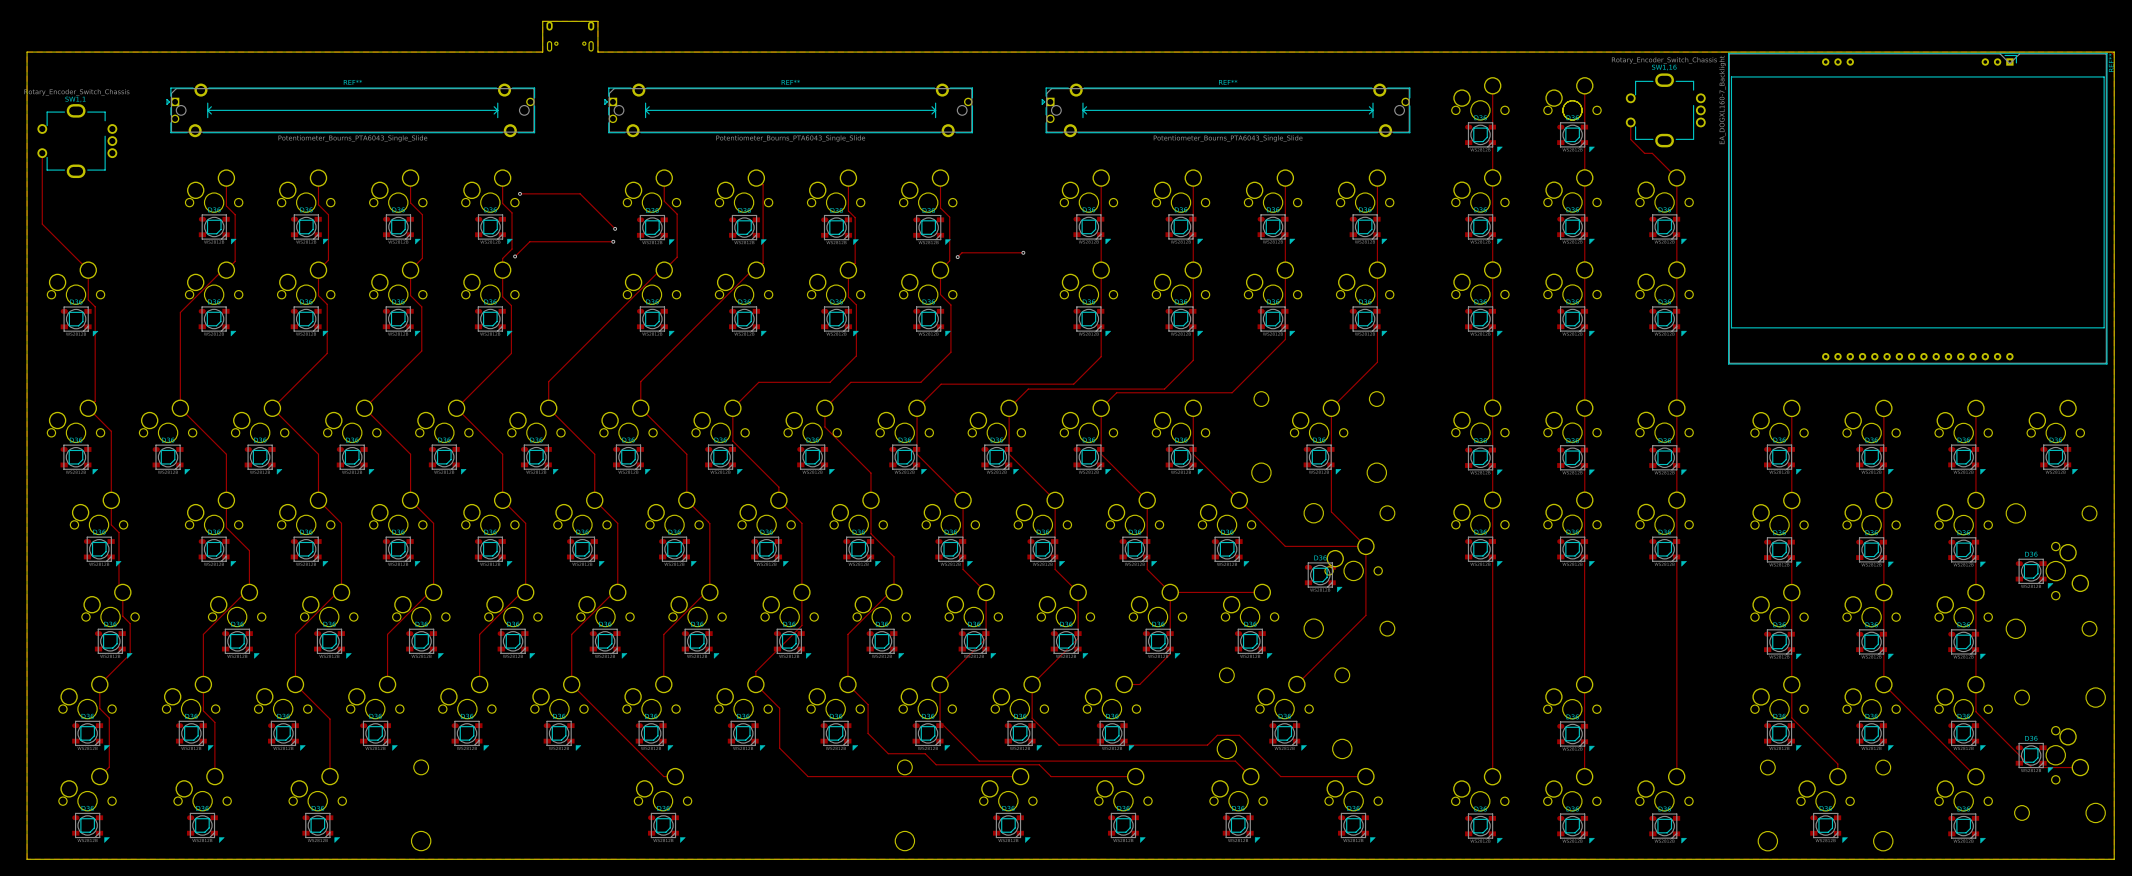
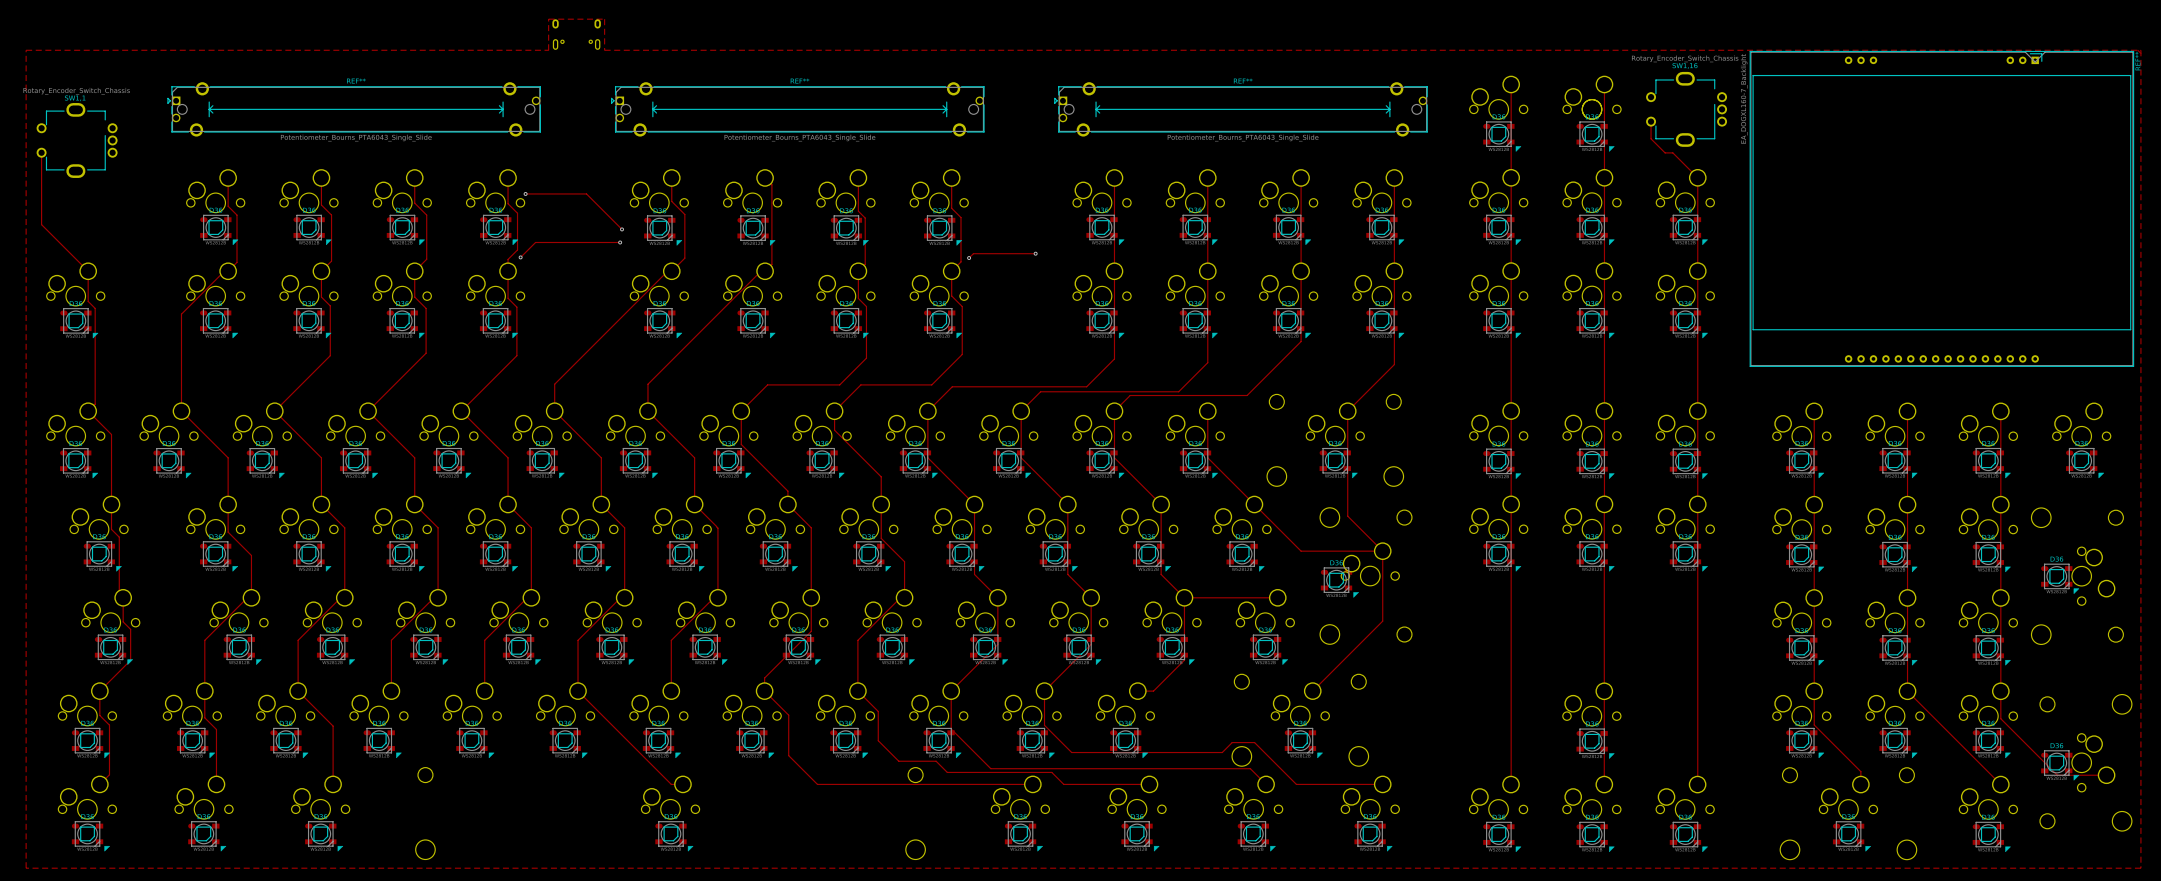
board edge: (542, 21) (542, 52) (27, 52) (27, 859) (2114, 859) (2114, 52) (597, 52) (597, 21) (542, 21) -> none

